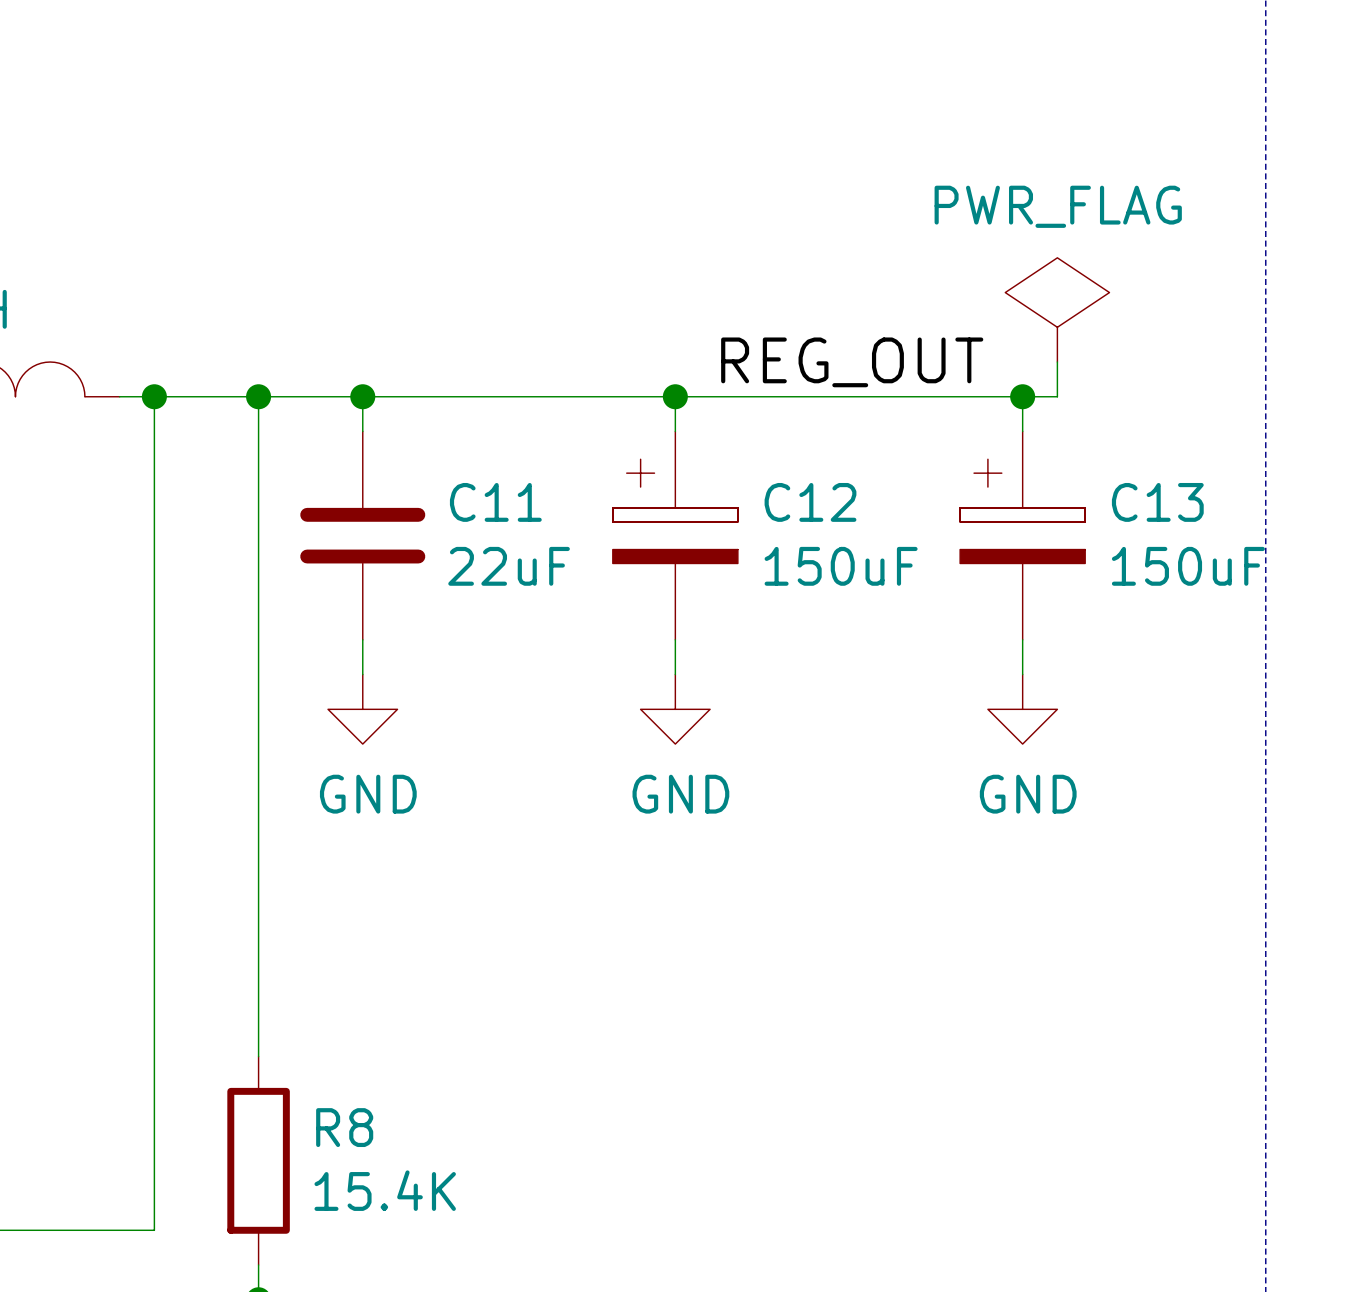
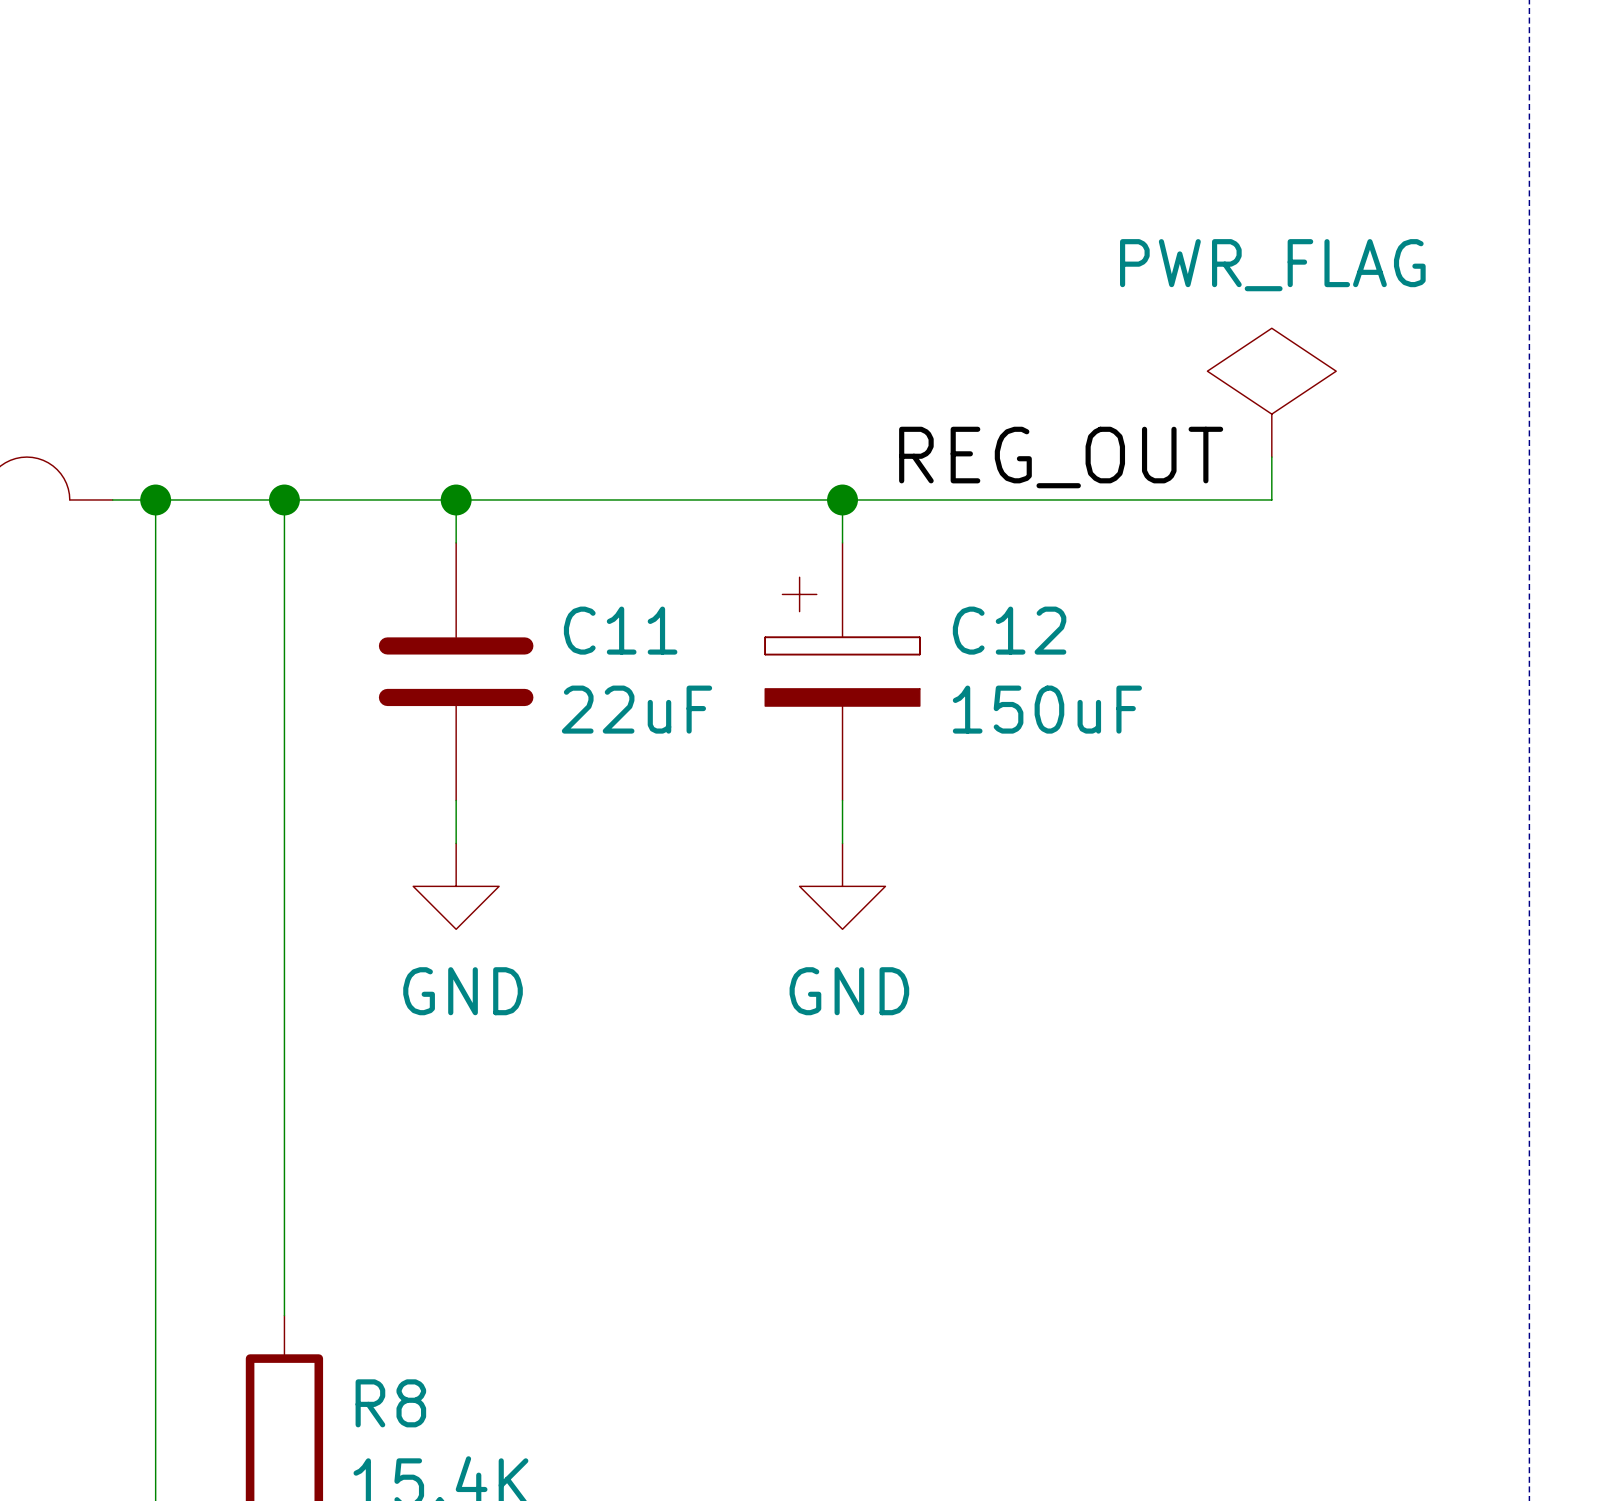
label position: REG_OUT (852, 362) -> REG_OUT (1061, 457)
wire: (362, 396) (362, 431) -> (456, 499) (456, 542)
junction position: (362, 396) -> (456, 499)
wire: (675, 396) (675, 431) -> (842, 499) (842, 542)
junction position: (675, 396) -> (842, 499)
wire: (1022, 396) (1022, 431) -> none
junction: (1022, 396) -> none
C11 position: (362, 535) -> (456, 671)
C12 position: (675, 535) -> (842, 671)
C13: 150uF (1022, 535) -> none
wire: (362, 639) (362, 674) -> (456, 800) (456, 843)
wire: (675, 639) (675, 674) -> (842, 800) (842, 843)
wire: (1022, 639) (1022, 674) -> none
power symbol position: GND (362, 709) -> GND (456, 886)
power symbol position: GND (675, 709) -> GND (842, 886)
power symbol: GND (1022, 709) -> none

